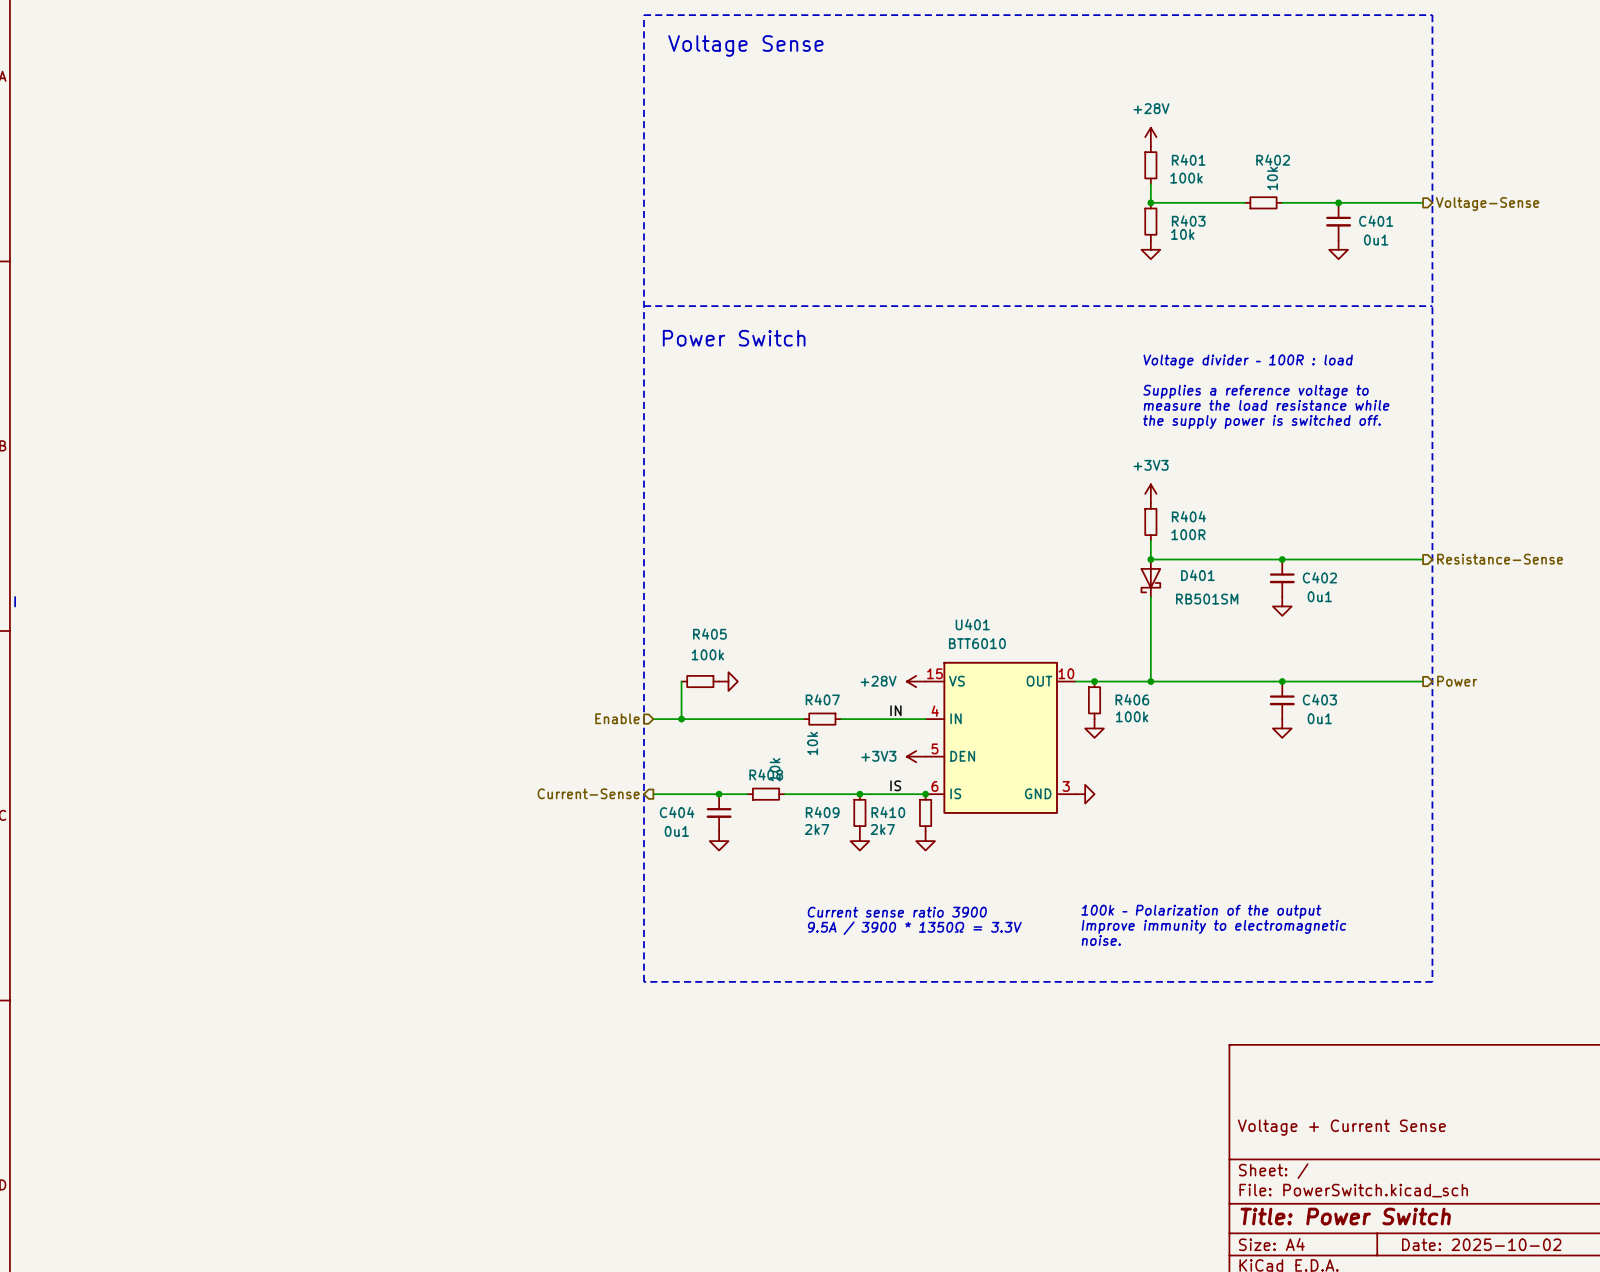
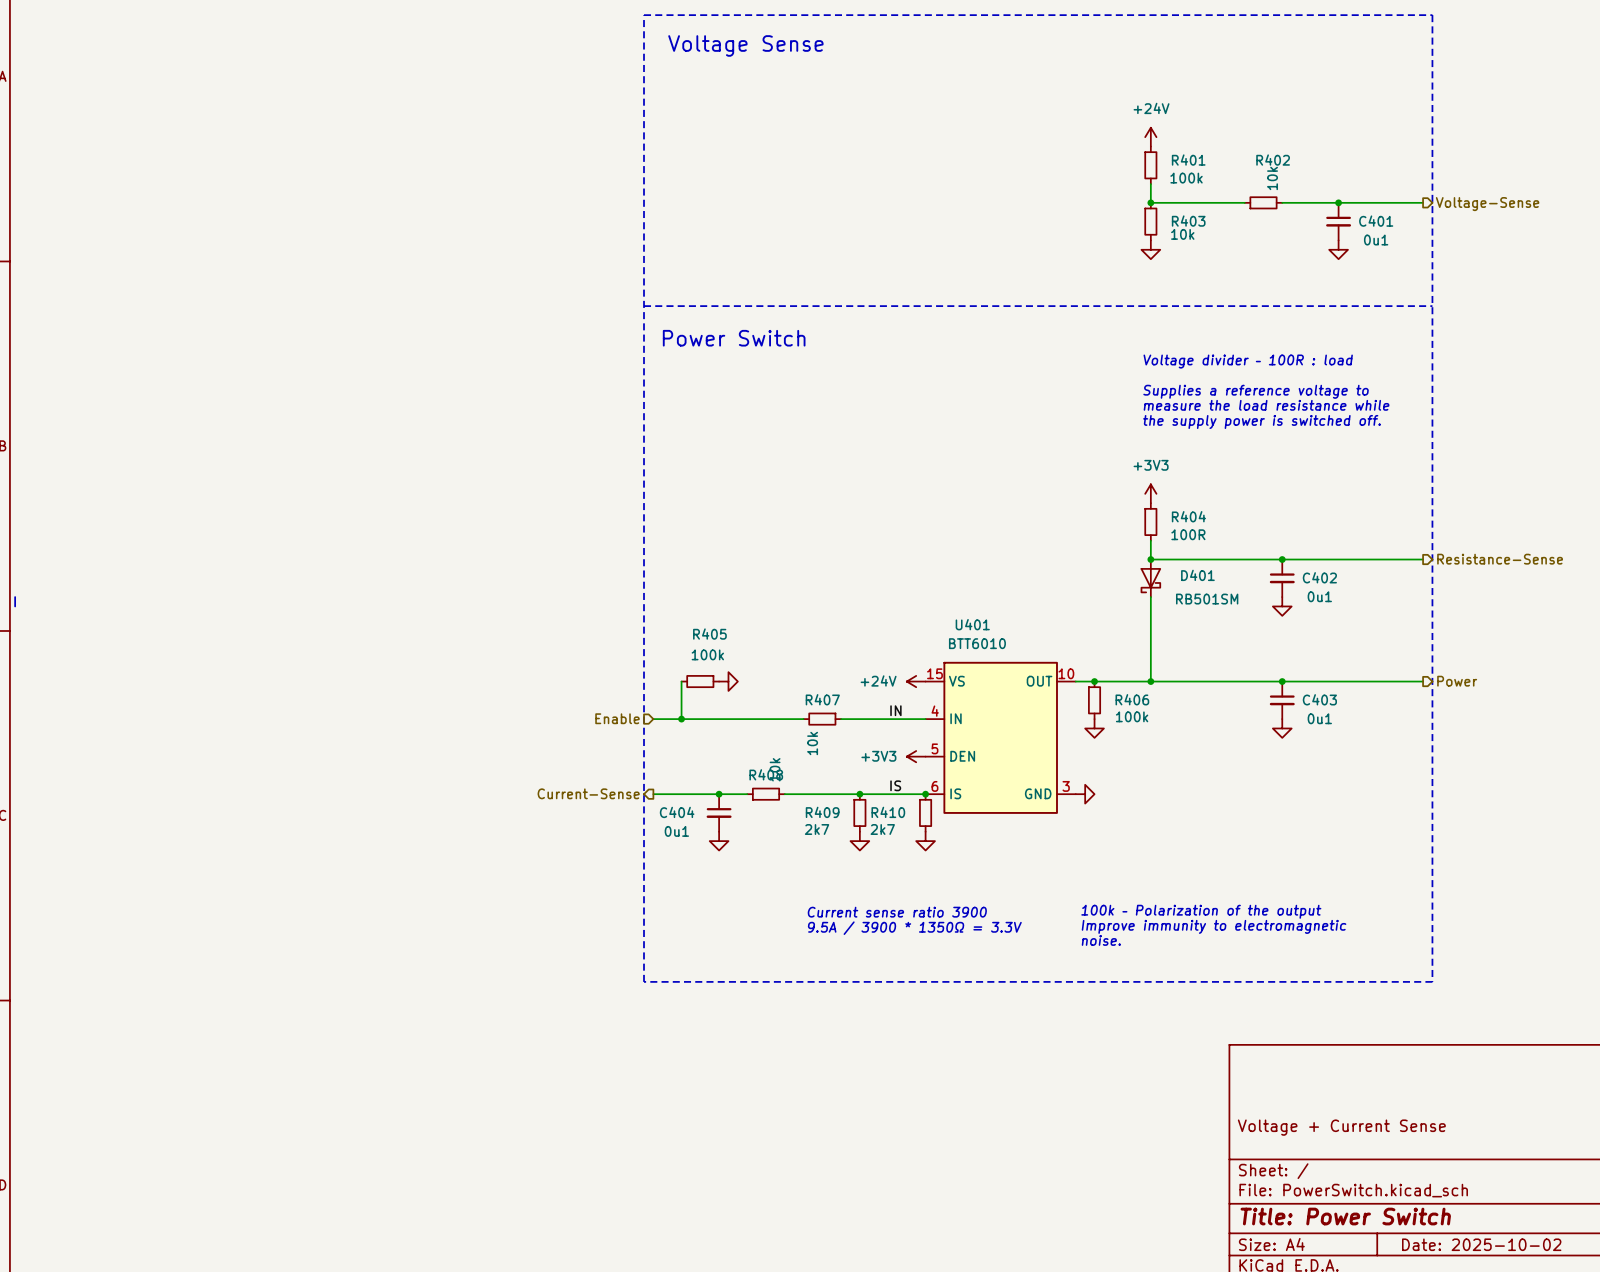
power symbol: +28V (1150, 137) -> +24V (1150, 137)
power symbol: +28V (916, 681) -> +24V (916, 681)

